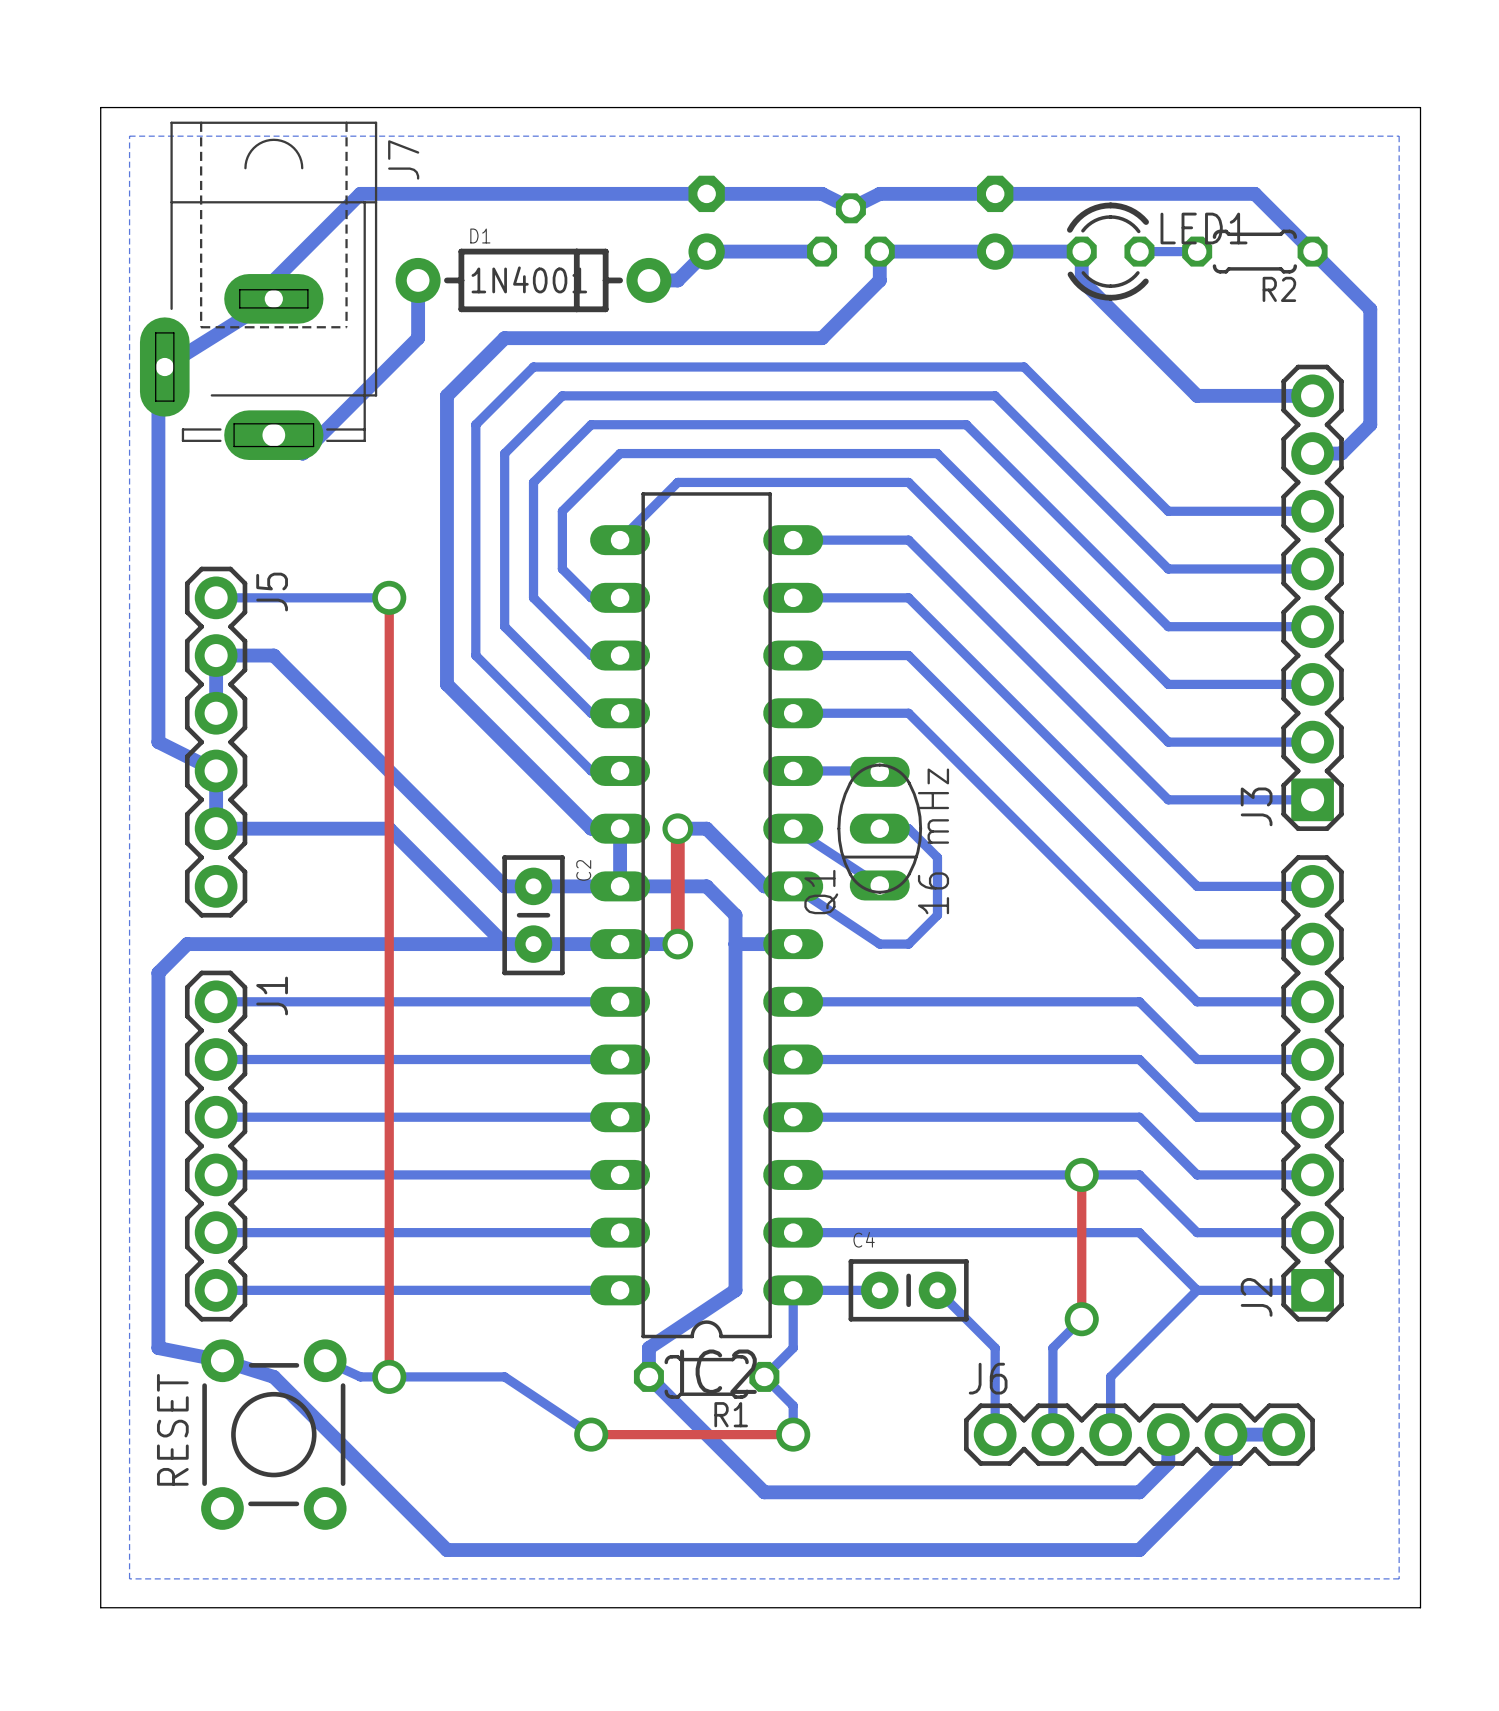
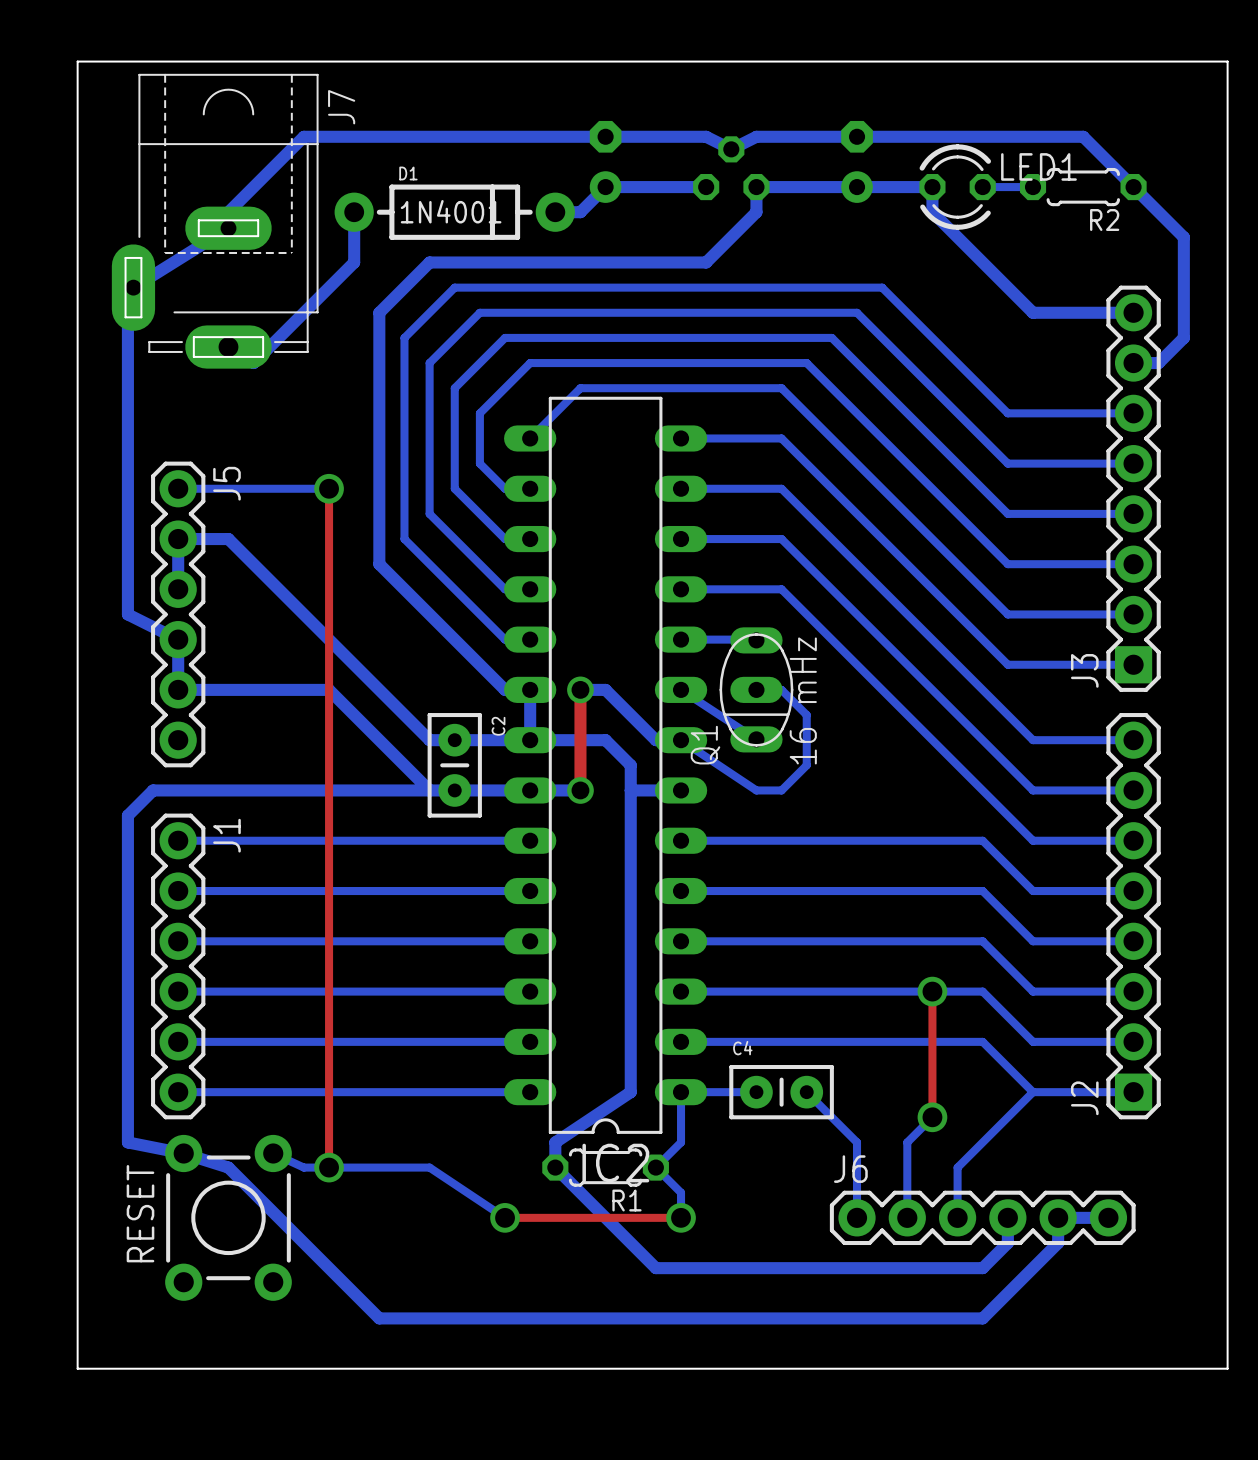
bottom zone outline: (129, 136) (129, 1578) (1399, 1578) (1399, 136) (129, 136) -> none

